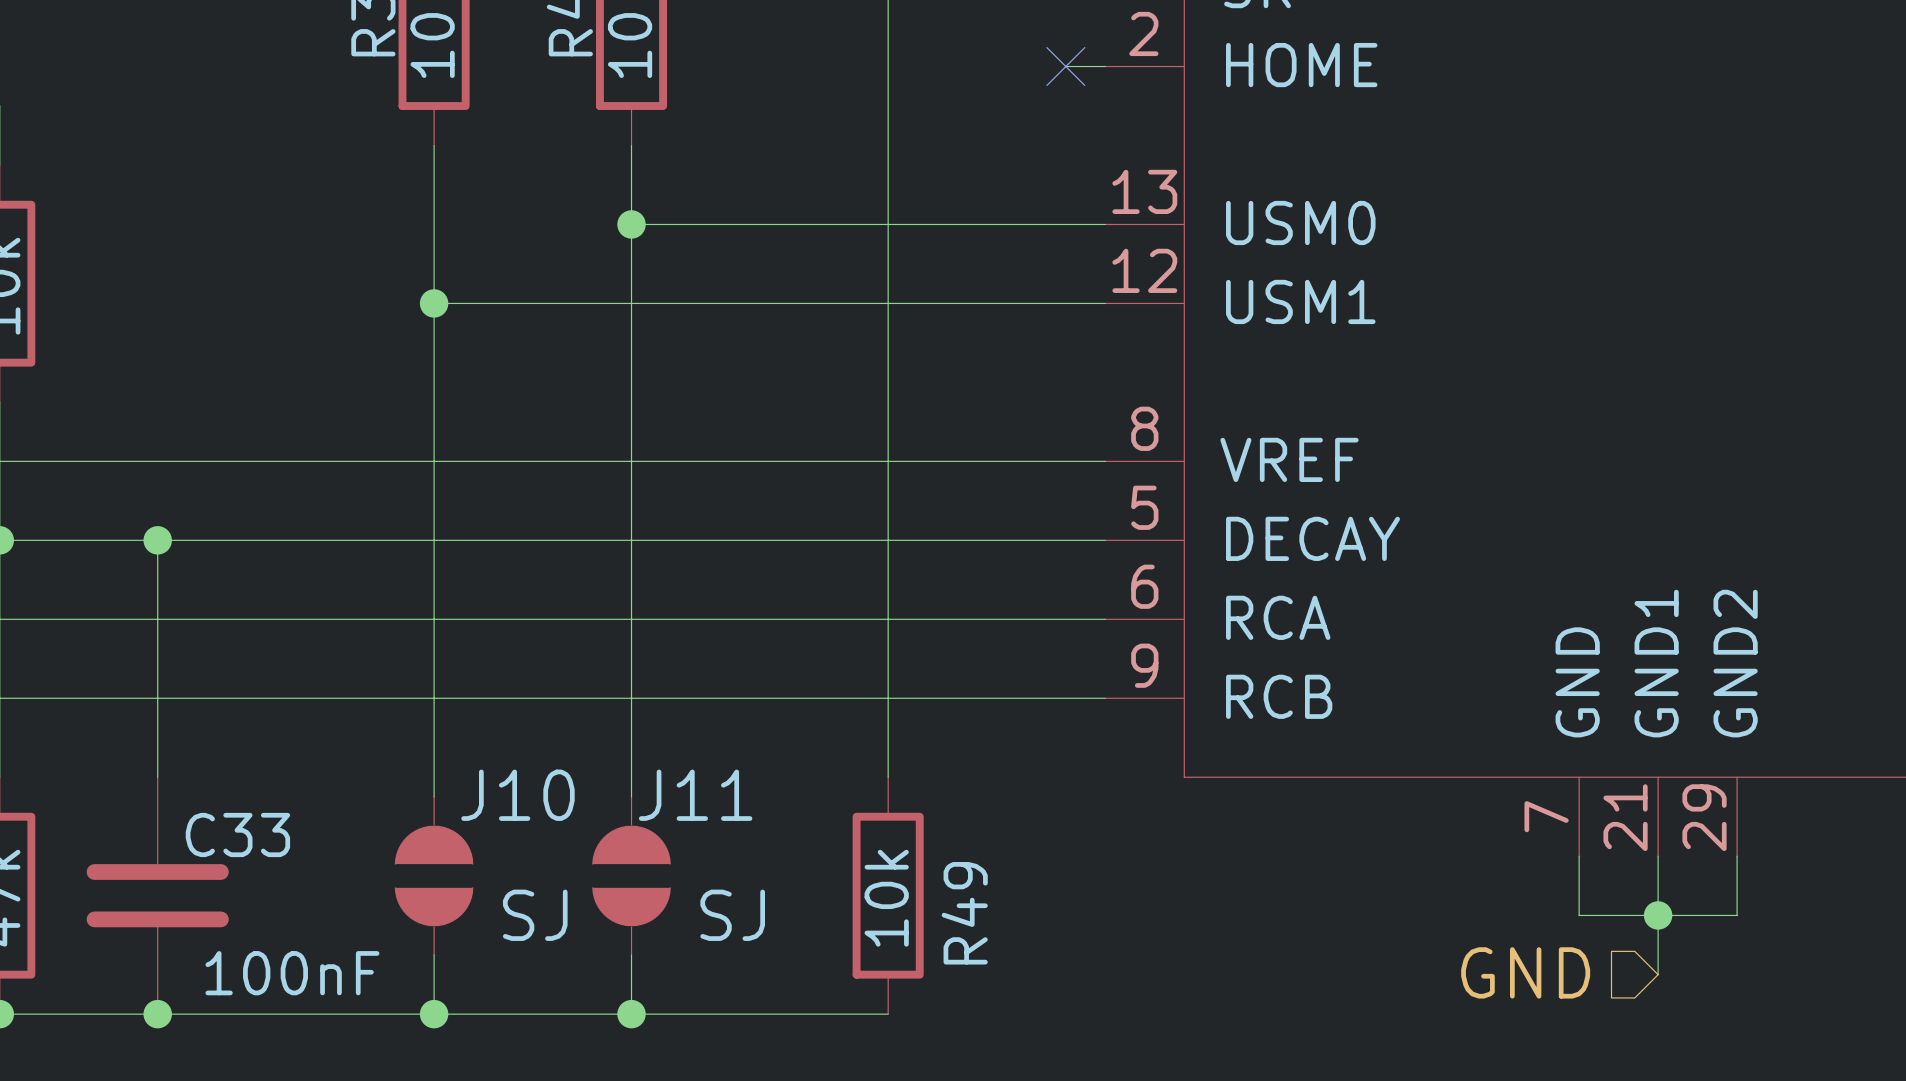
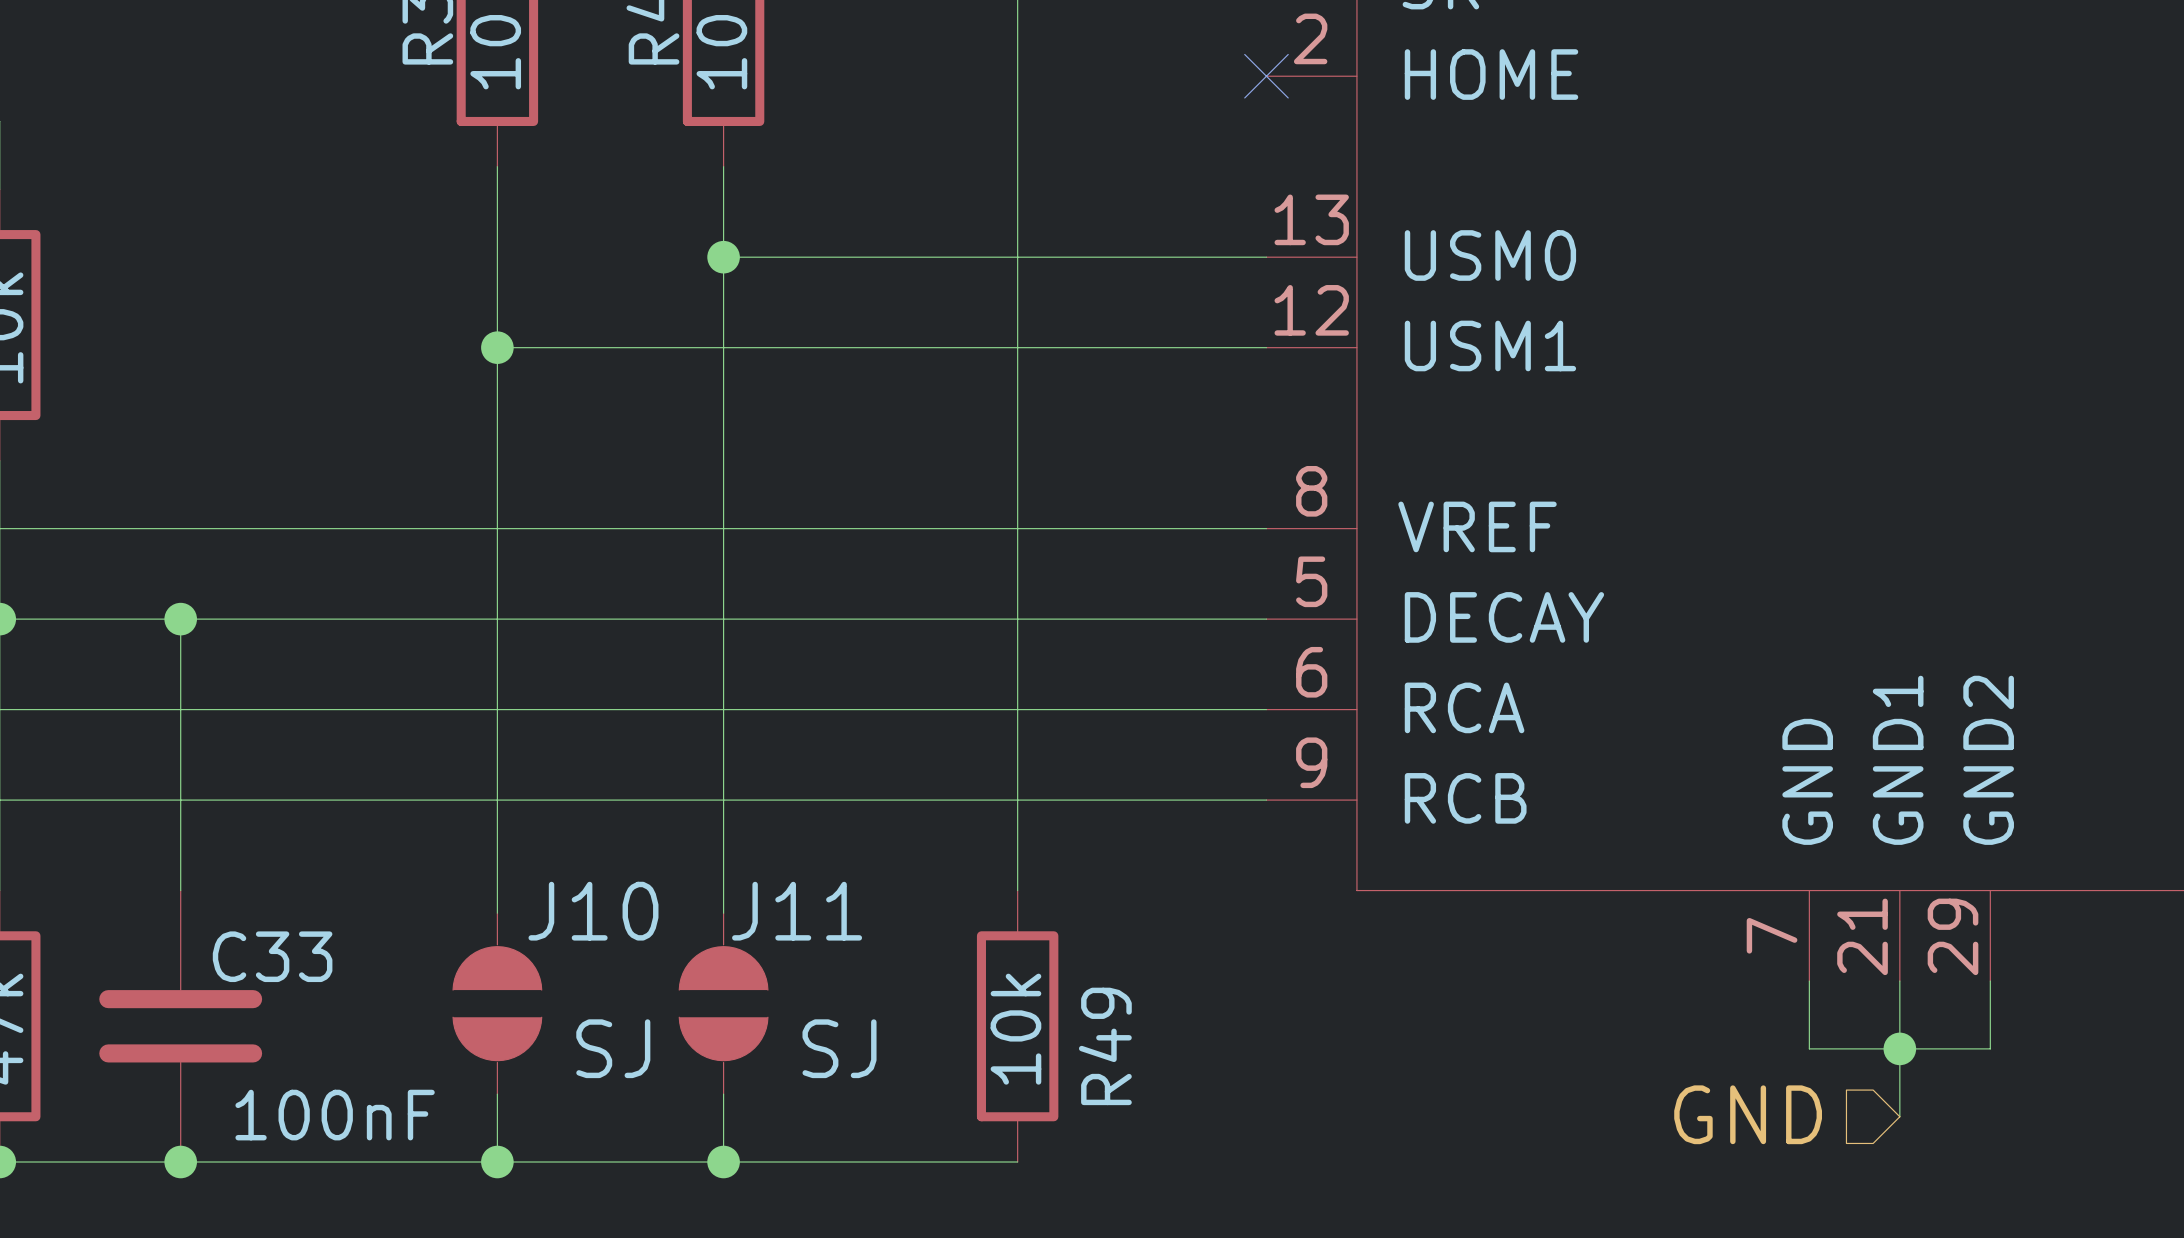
wire: (1065, 66) (1105, 66) -> none
no-connect mark position: (1065, 66) -> (1266, 76)

